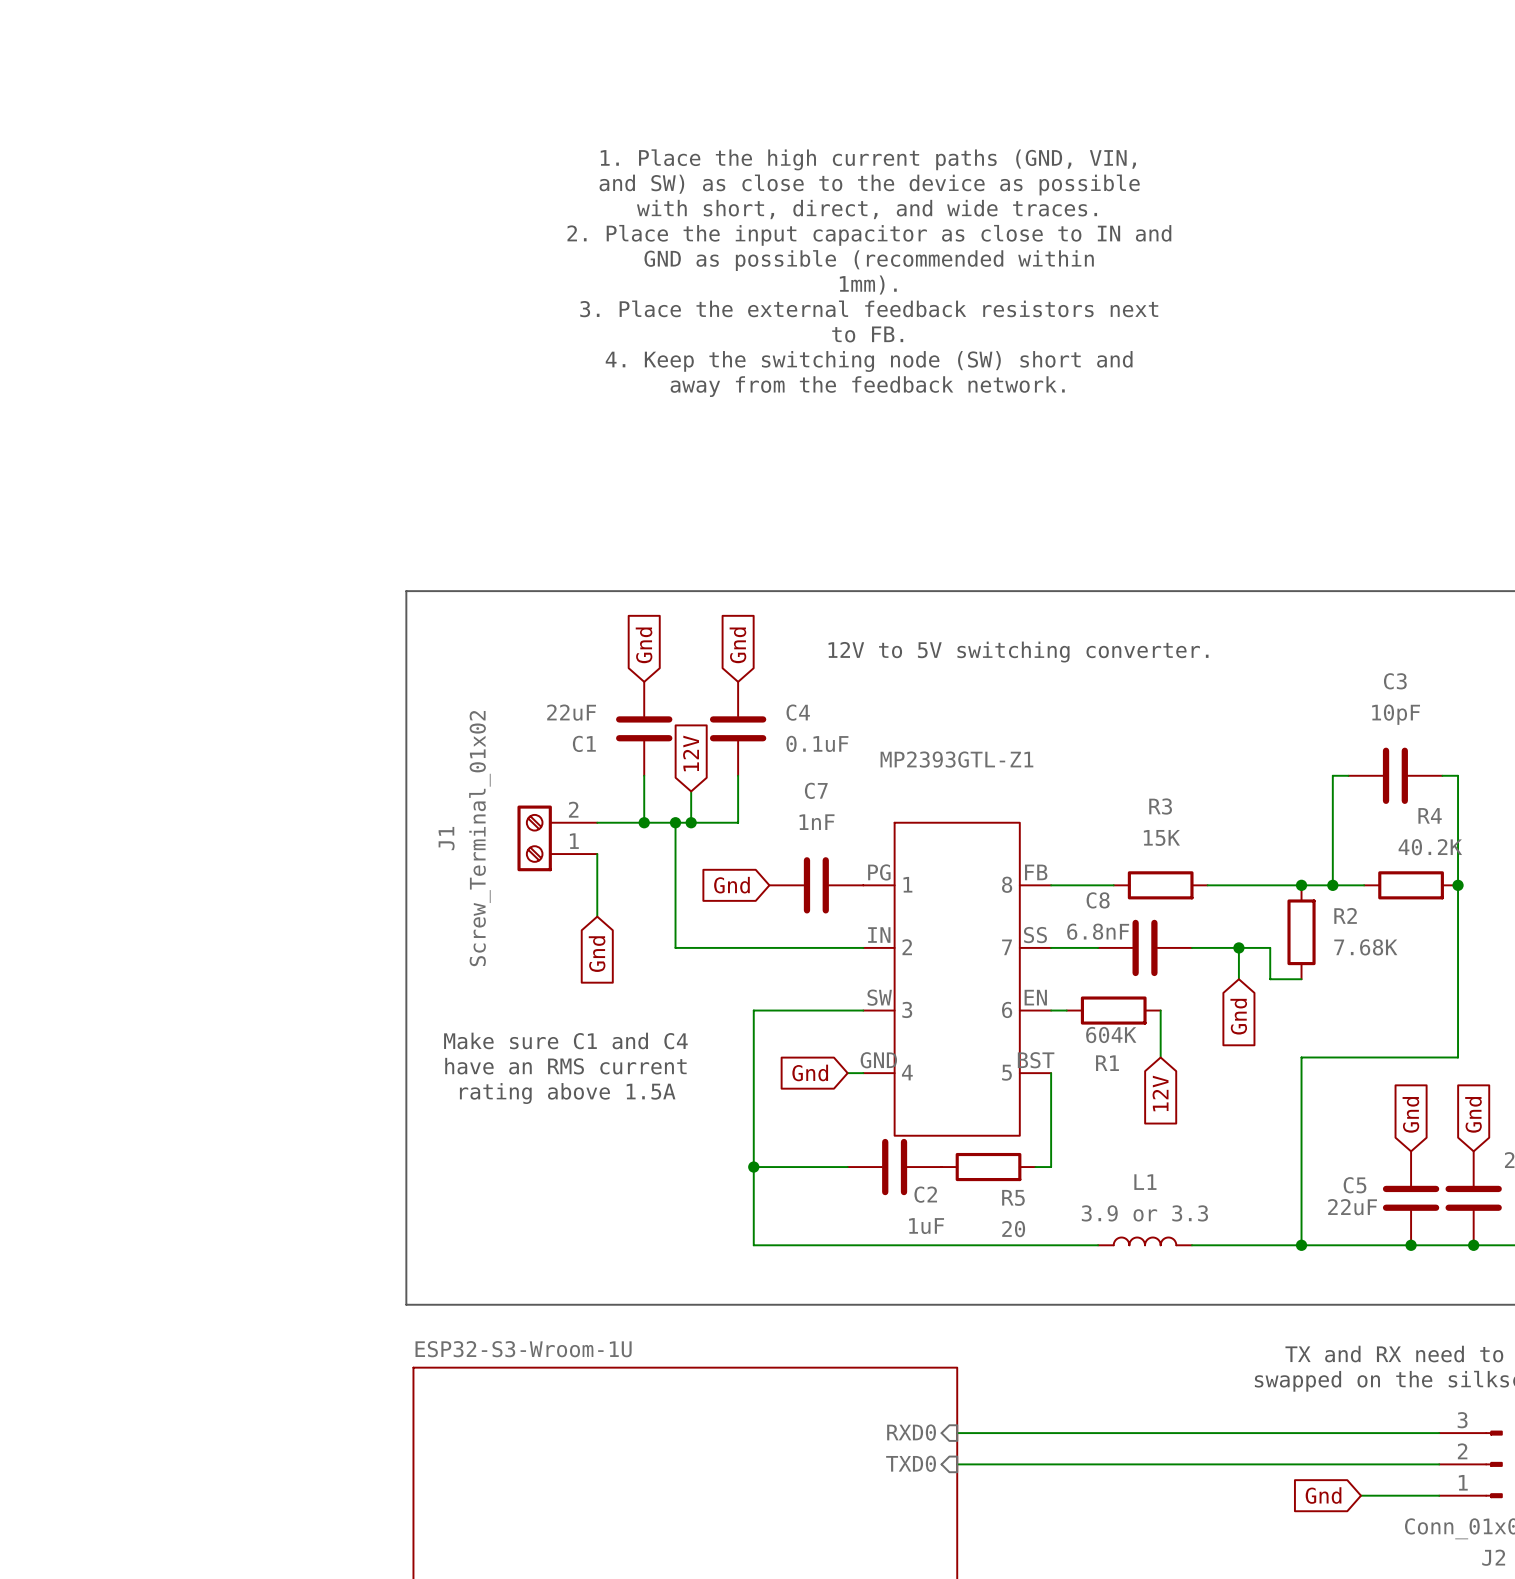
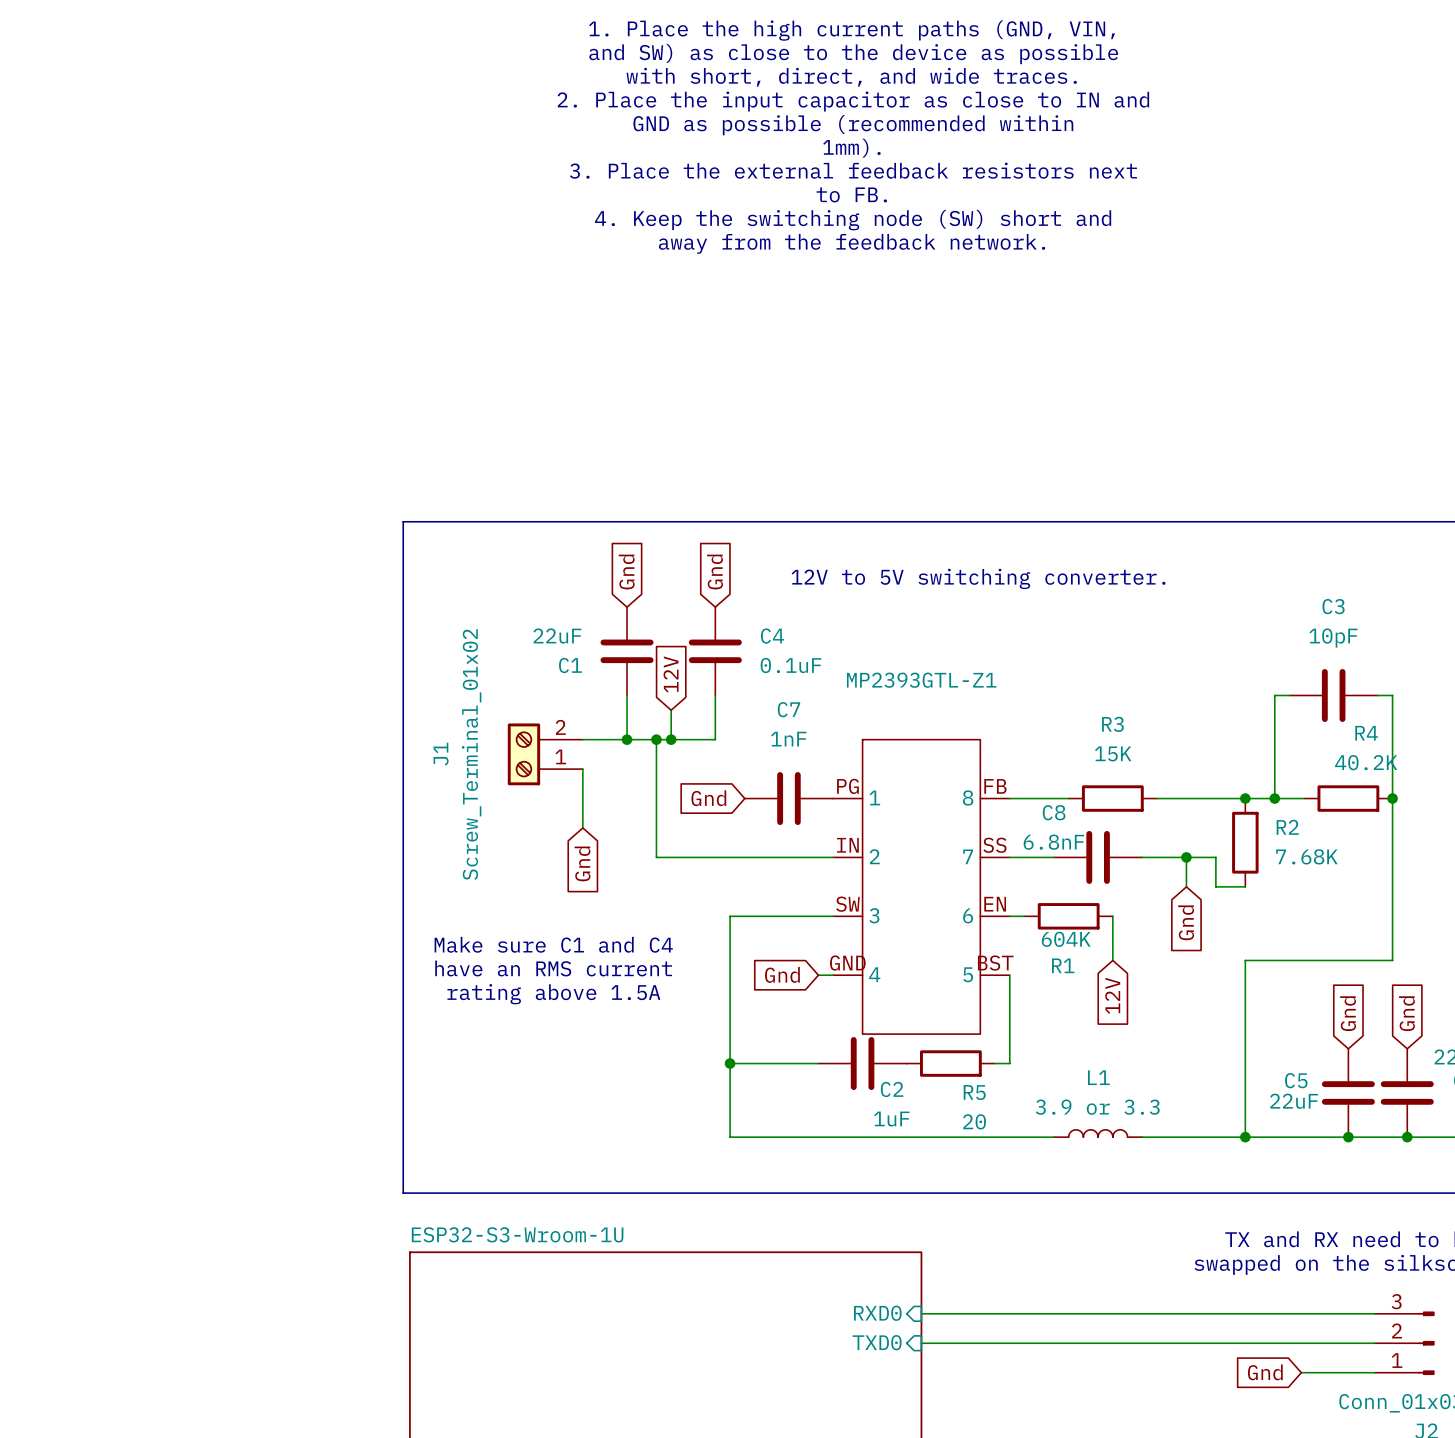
text position: 1. Place the high current paths (GND, VIN, (868, 159) -> 1. Place the high current paths (GND, VIN, (852, 30)
text position: and SW) as close to the device as possible (869, 184) -> and SW) as close to the device as possible (853, 54)
text position: with short, direct, and wide traces. (867, 209) -> with short, direct, and wide traces. (851, 77)
text position: 2. Place the input capacitor as close to IN and (869, 235) -> 2. Place the input capacitor as close to IN and (853, 101)
text position: GND as possible (recommended within (869, 260) -> GND as possible (recommended within (853, 125)
text position: 1mm). (868, 285) -> 1mm). (851, 148)
text position: 3. Place the external feedback resistors next (869, 308) -> 3. Place the external feedback resistors next (853, 170)
text position: to FB. (867, 334) -> to FB. (851, 194)
text position: 4. Keep the switching node (SW) short and (869, 361) -> 4. Keep the switching node (SW) short and (853, 220)
text position: away from the feedback network. (867, 386) -> away from the feedback network. (852, 243)

